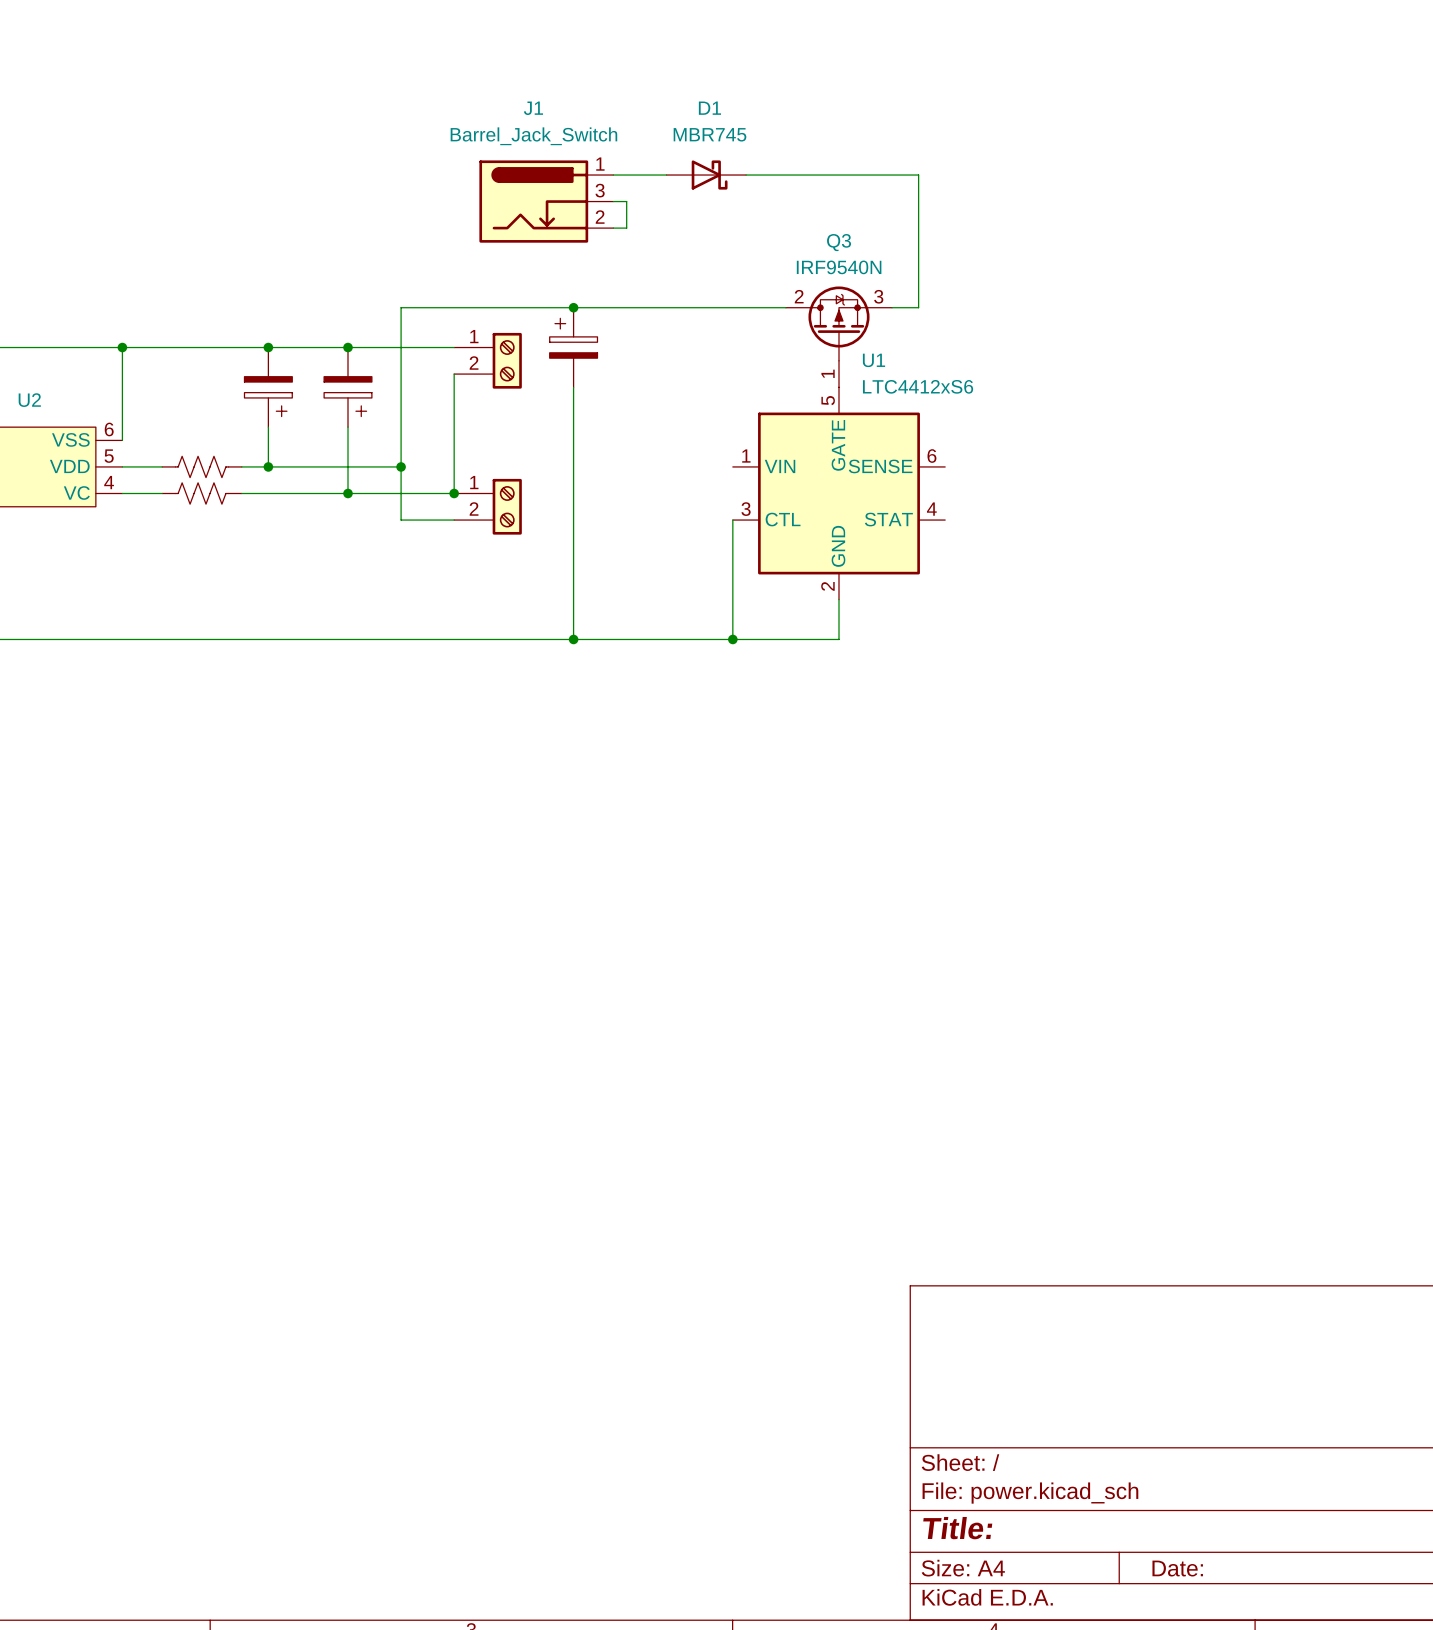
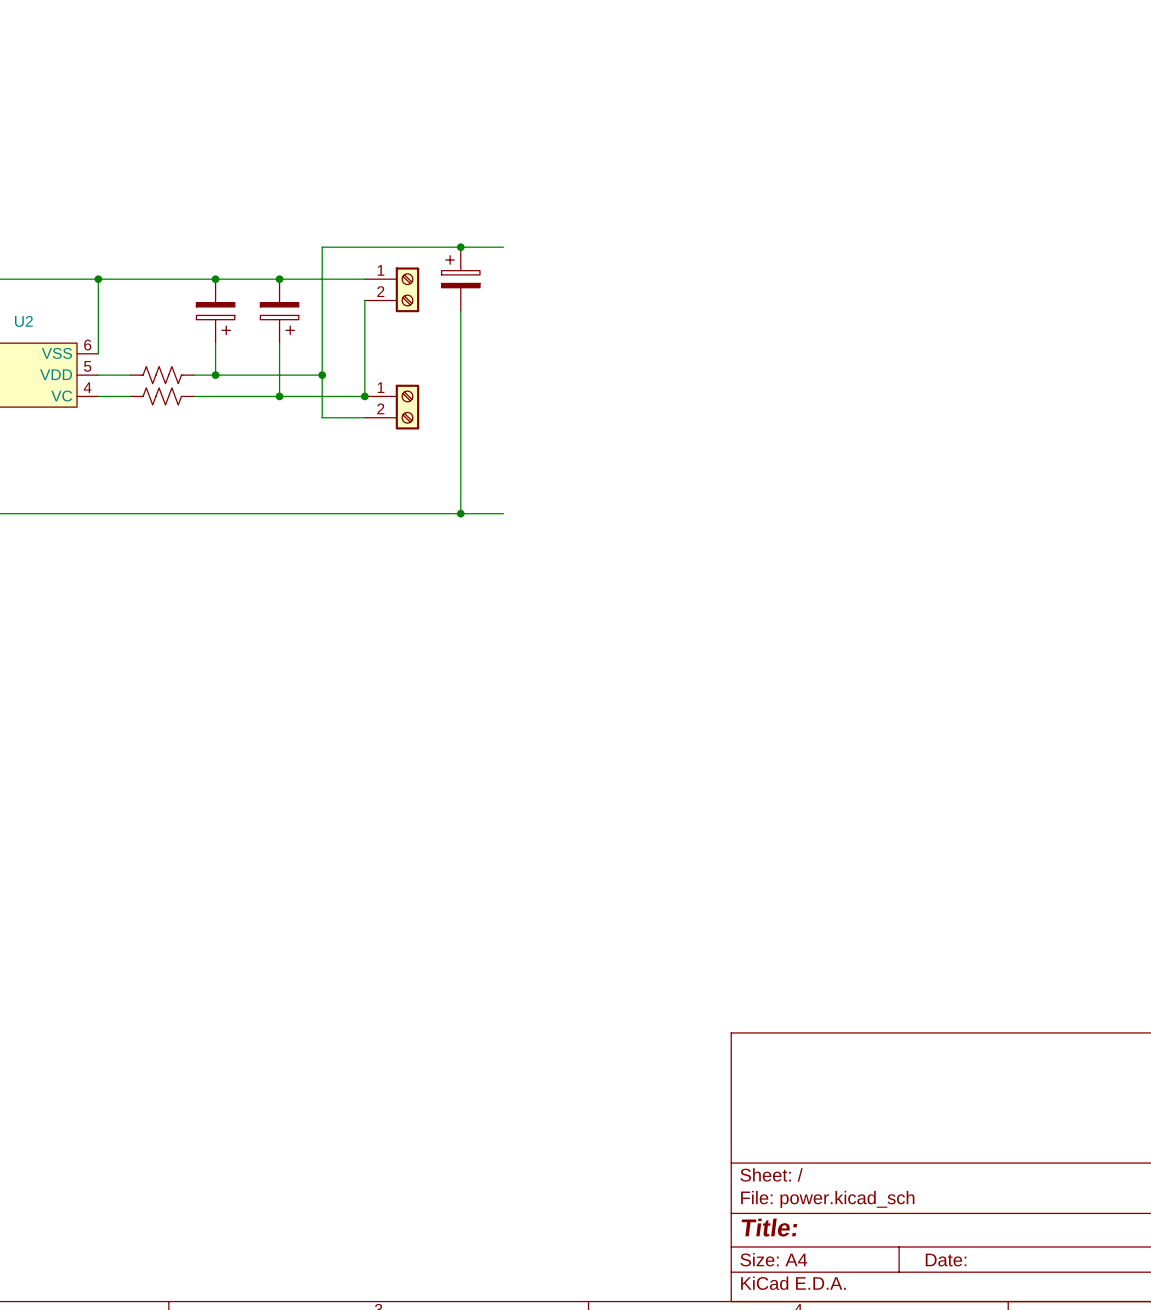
wire: (613, 175) (666, 175) -> none
D1: MBR745 (706, 175) -> none
wire: (746, 175) (918, 175) (918, 307) (892, 307) -> none
J1: Barrel_Jack_Switch (546, 201) -> none
wire: (613, 201) (626, 201) (626, 228) (613, 228) -> none
wire: (626, 307) (785, 307) -> none
Q3: IRF9540N (838, 336) -> none
U1: LTC4412xS6 (838, 493) -> none
wire: (732, 520) (732, 639) -> none
wire: (838, 599) (838, 639) (626, 639) -> none
junction: (732, 639) -> none

